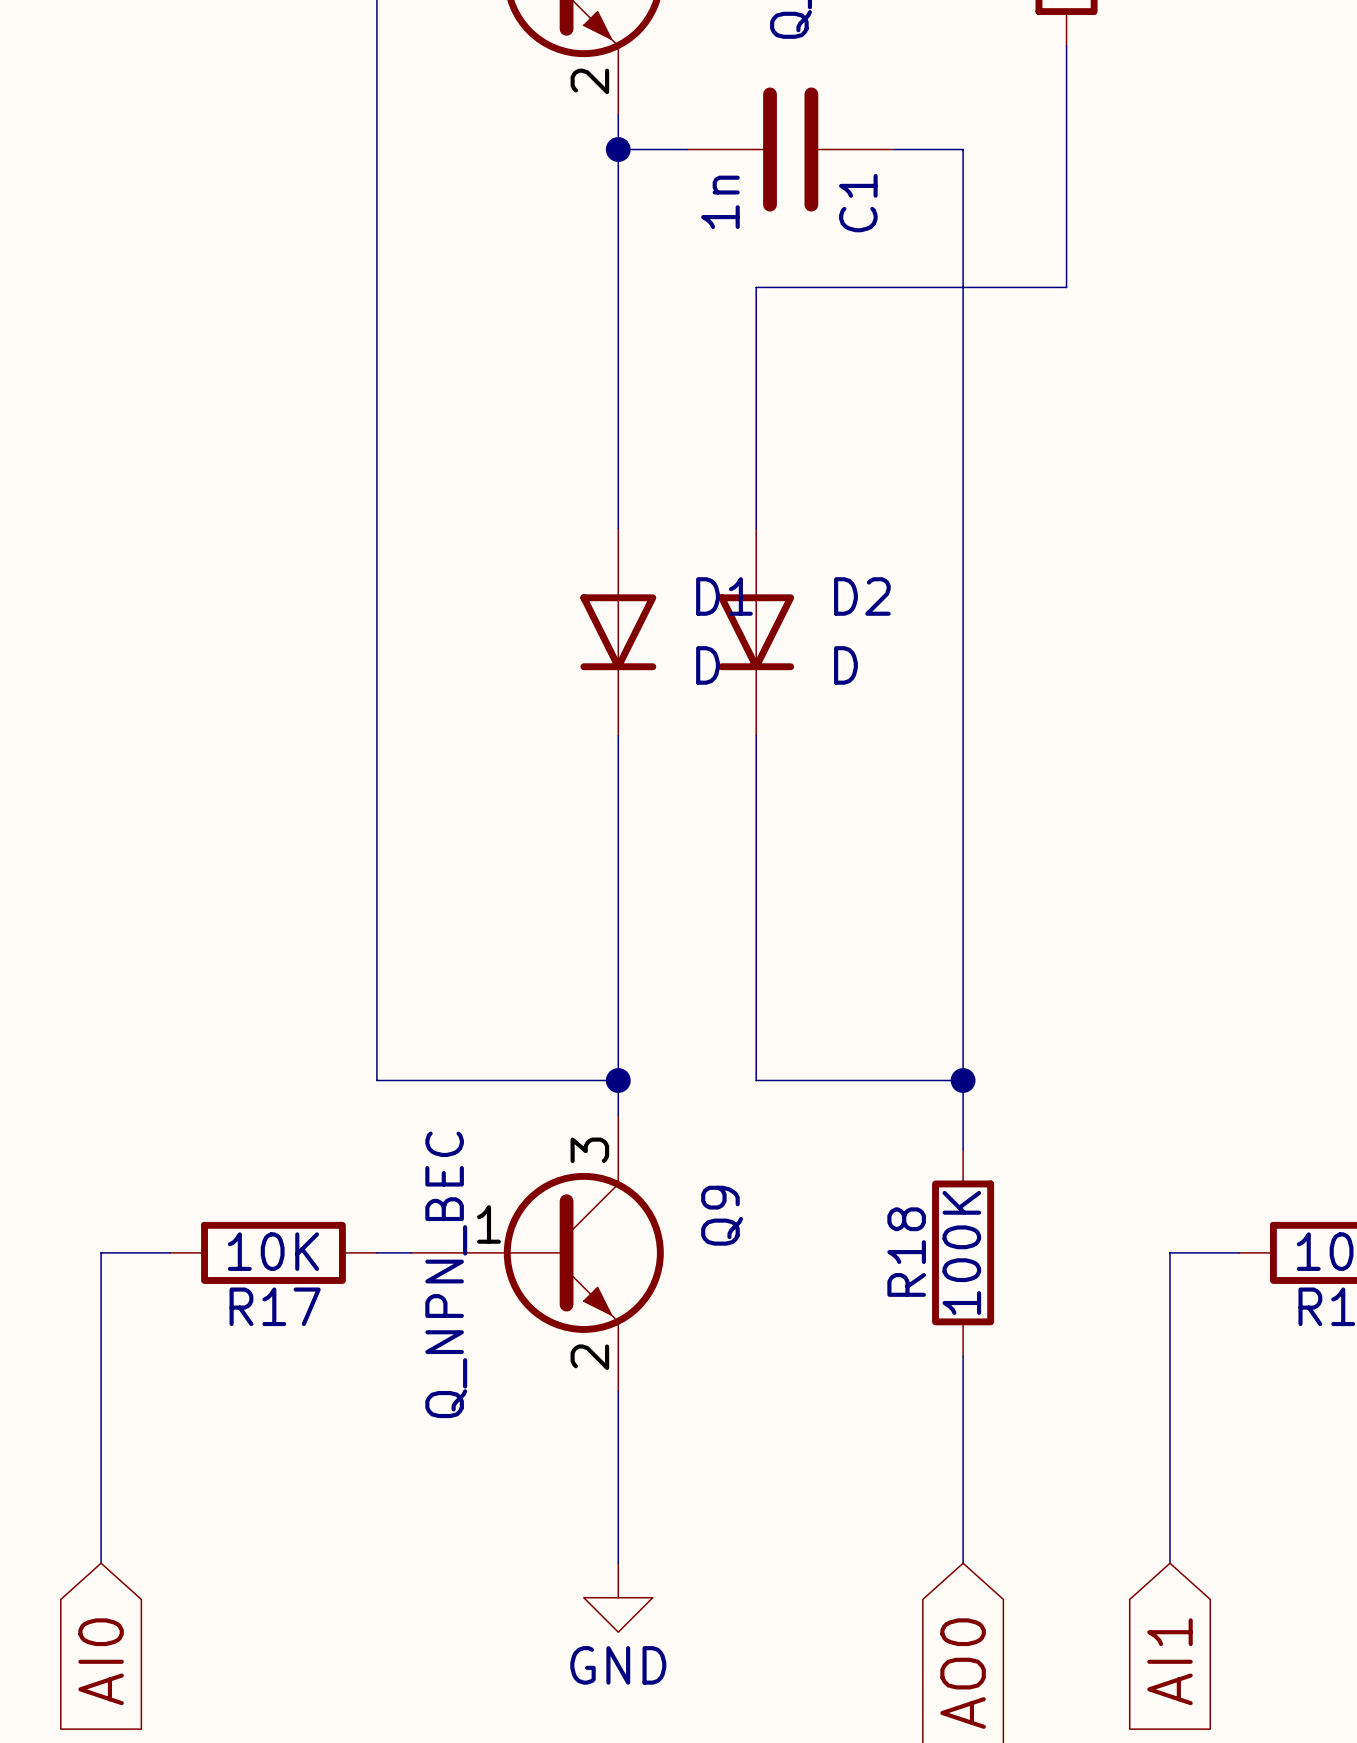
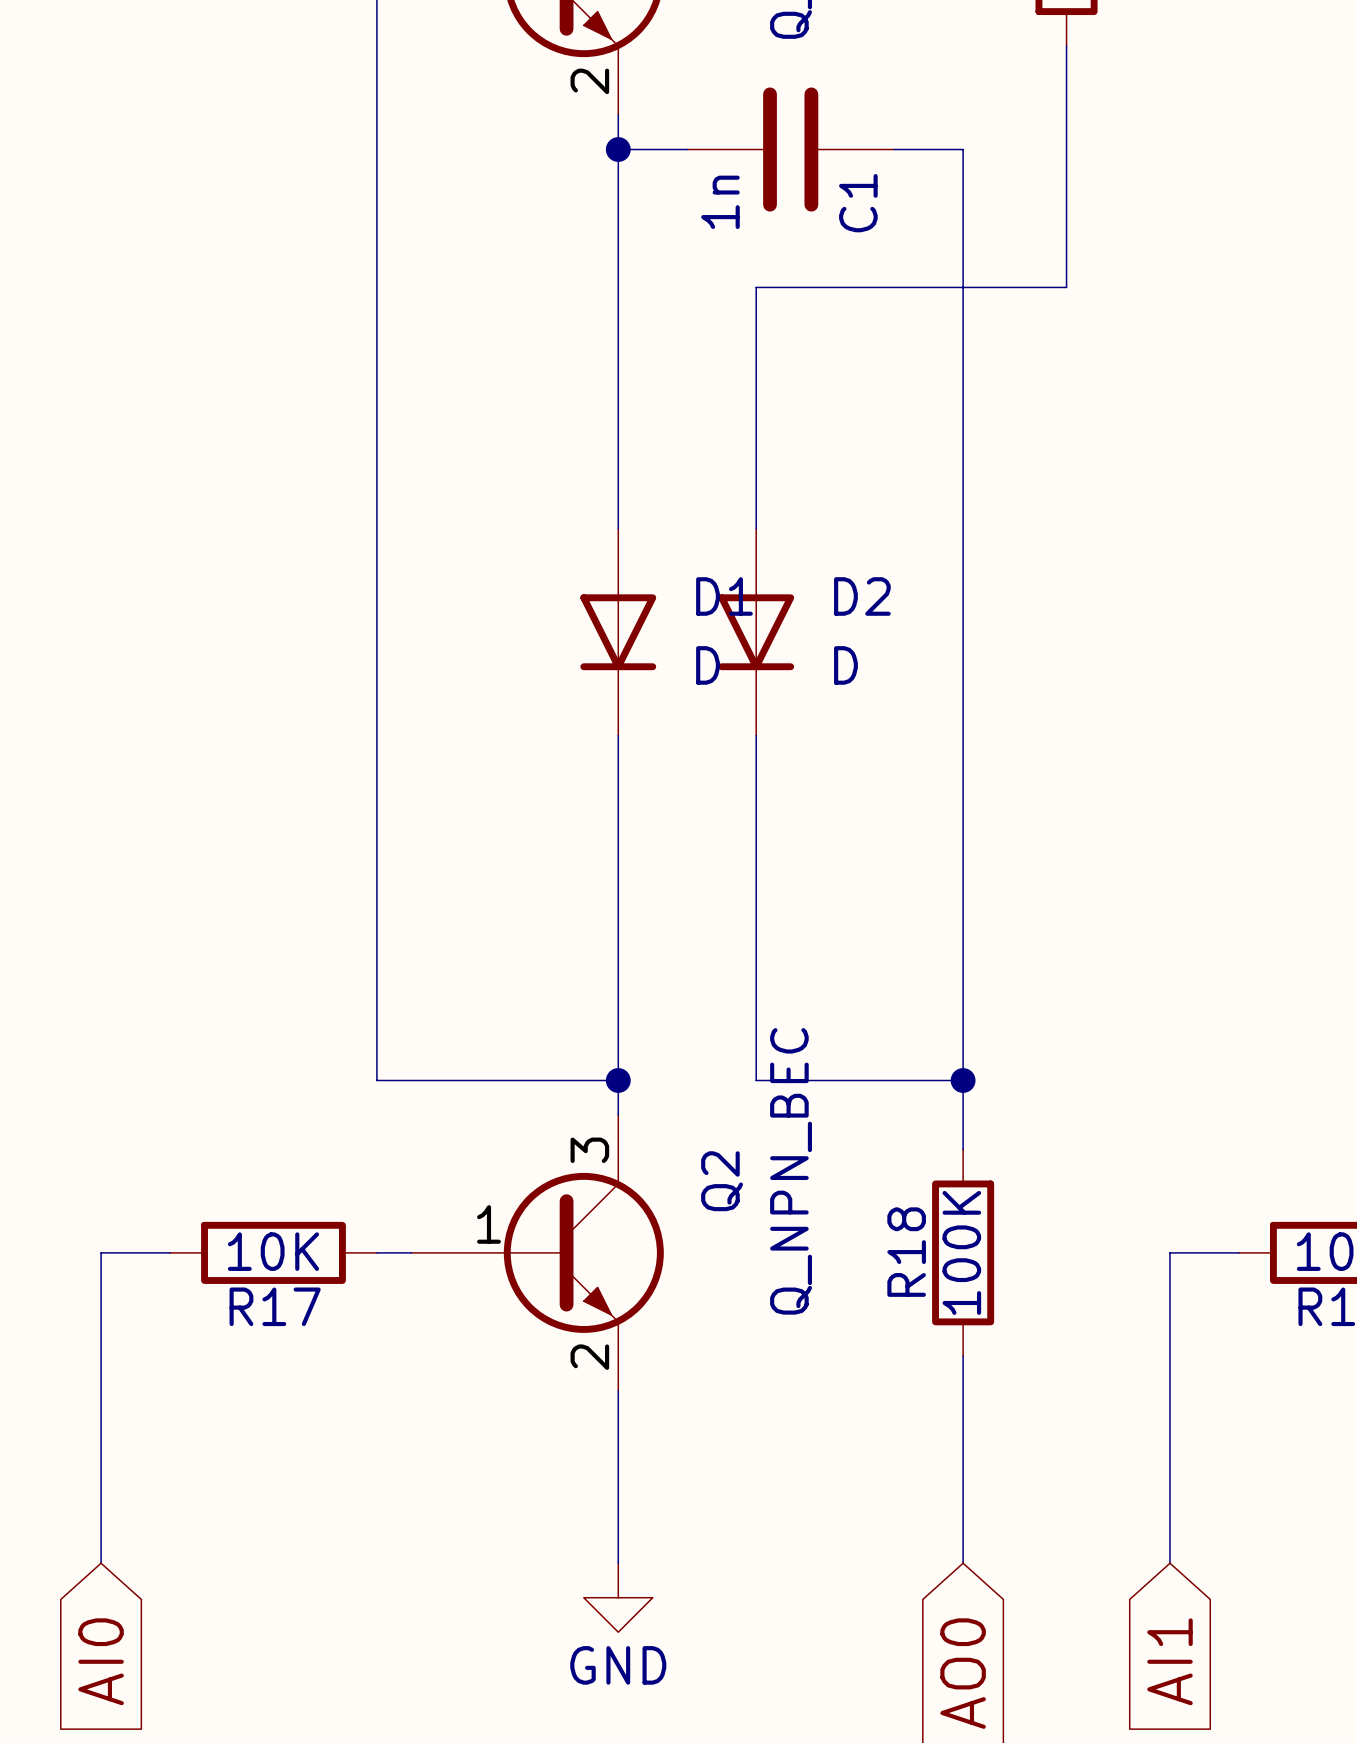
Q9 name: Q9 (722, 1215) -> Q2 (722, 1181)
Q9 value position: Q_NPN_BEC (446, 1274) -> Q_NPN_BEC (791, 1171)

